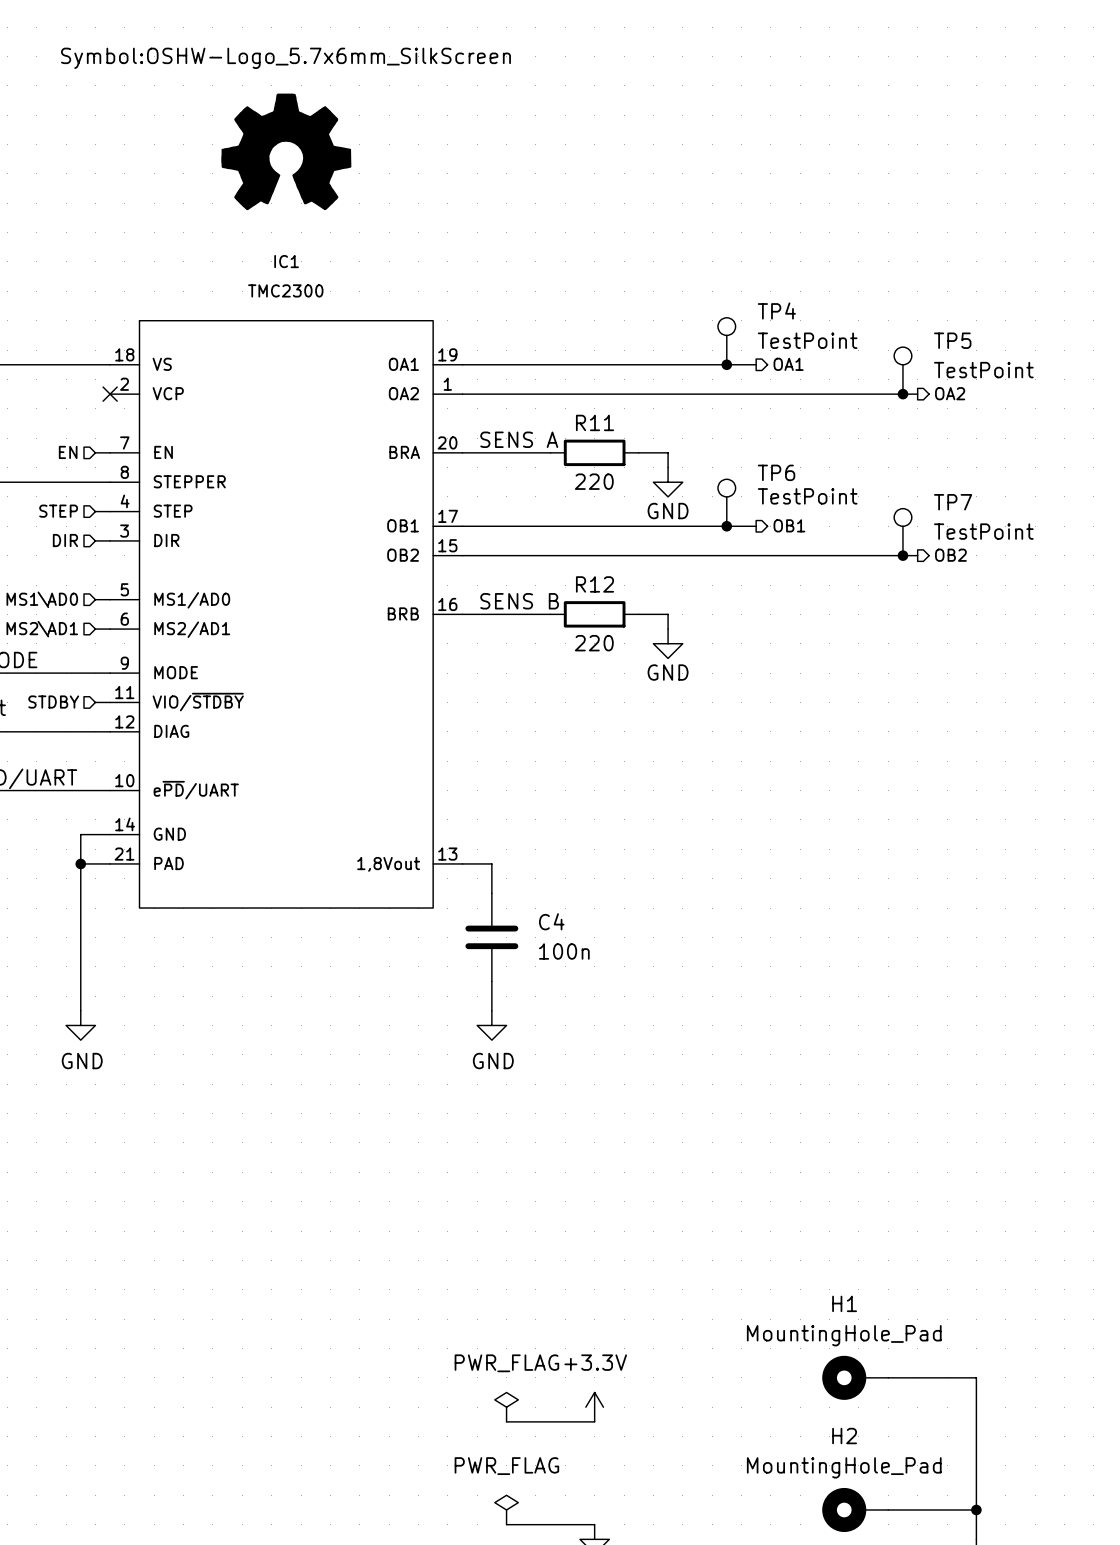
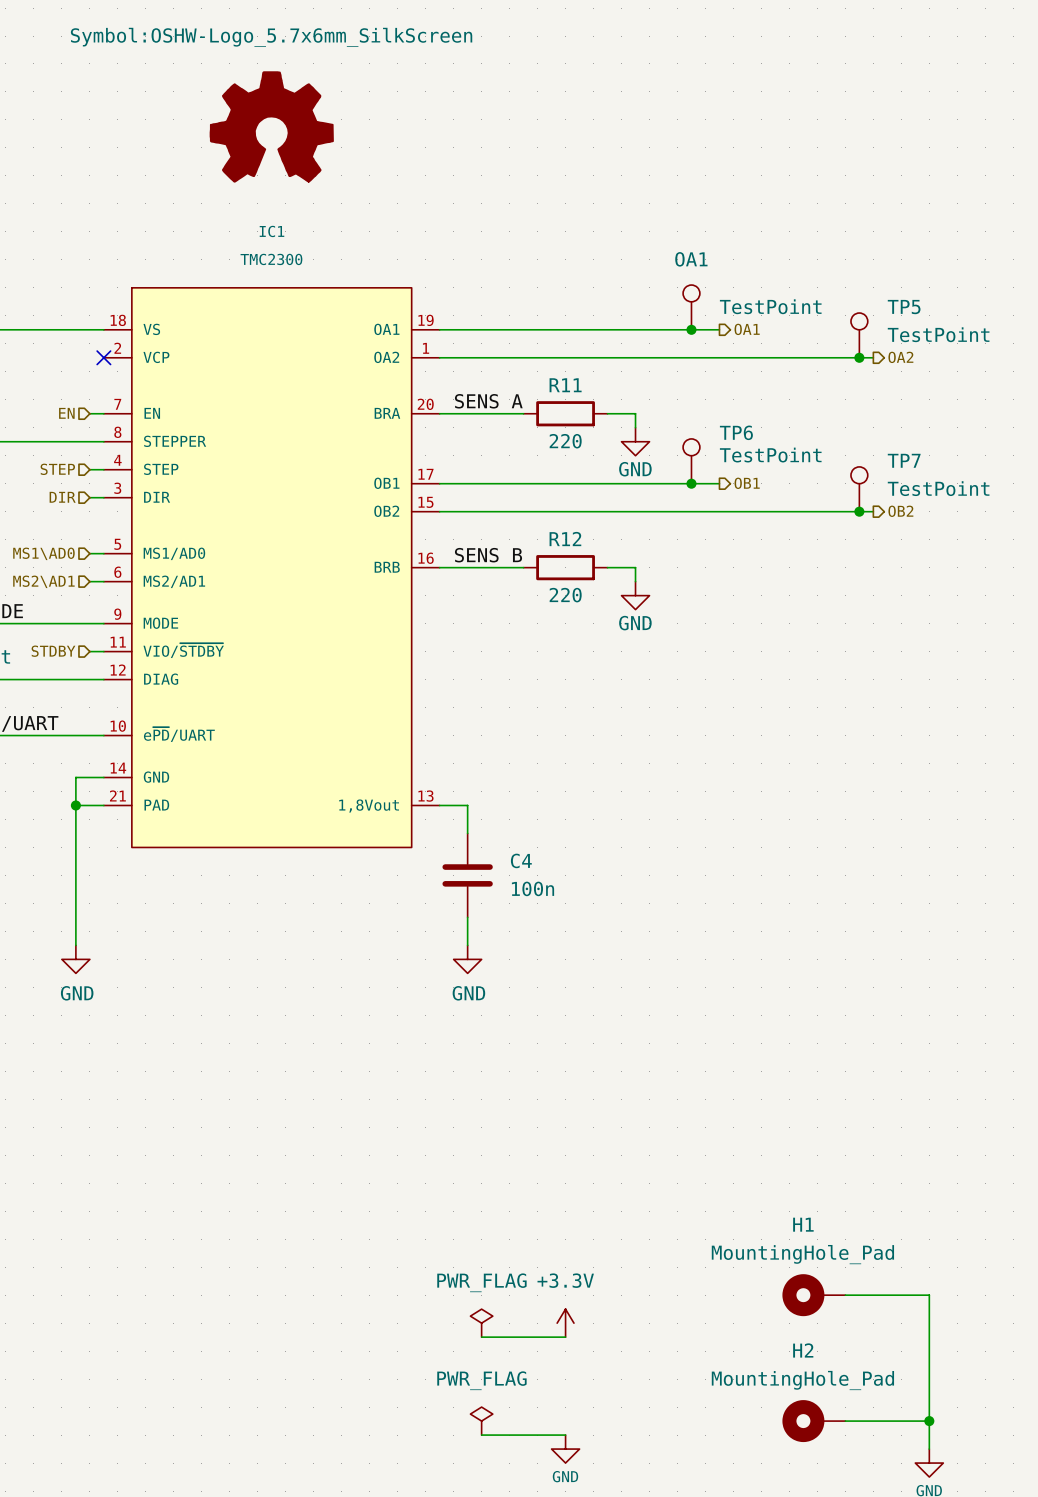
TP4 text: none -> OA1 (691, 259)
TP4 name: TP4 (776, 311) -> none

